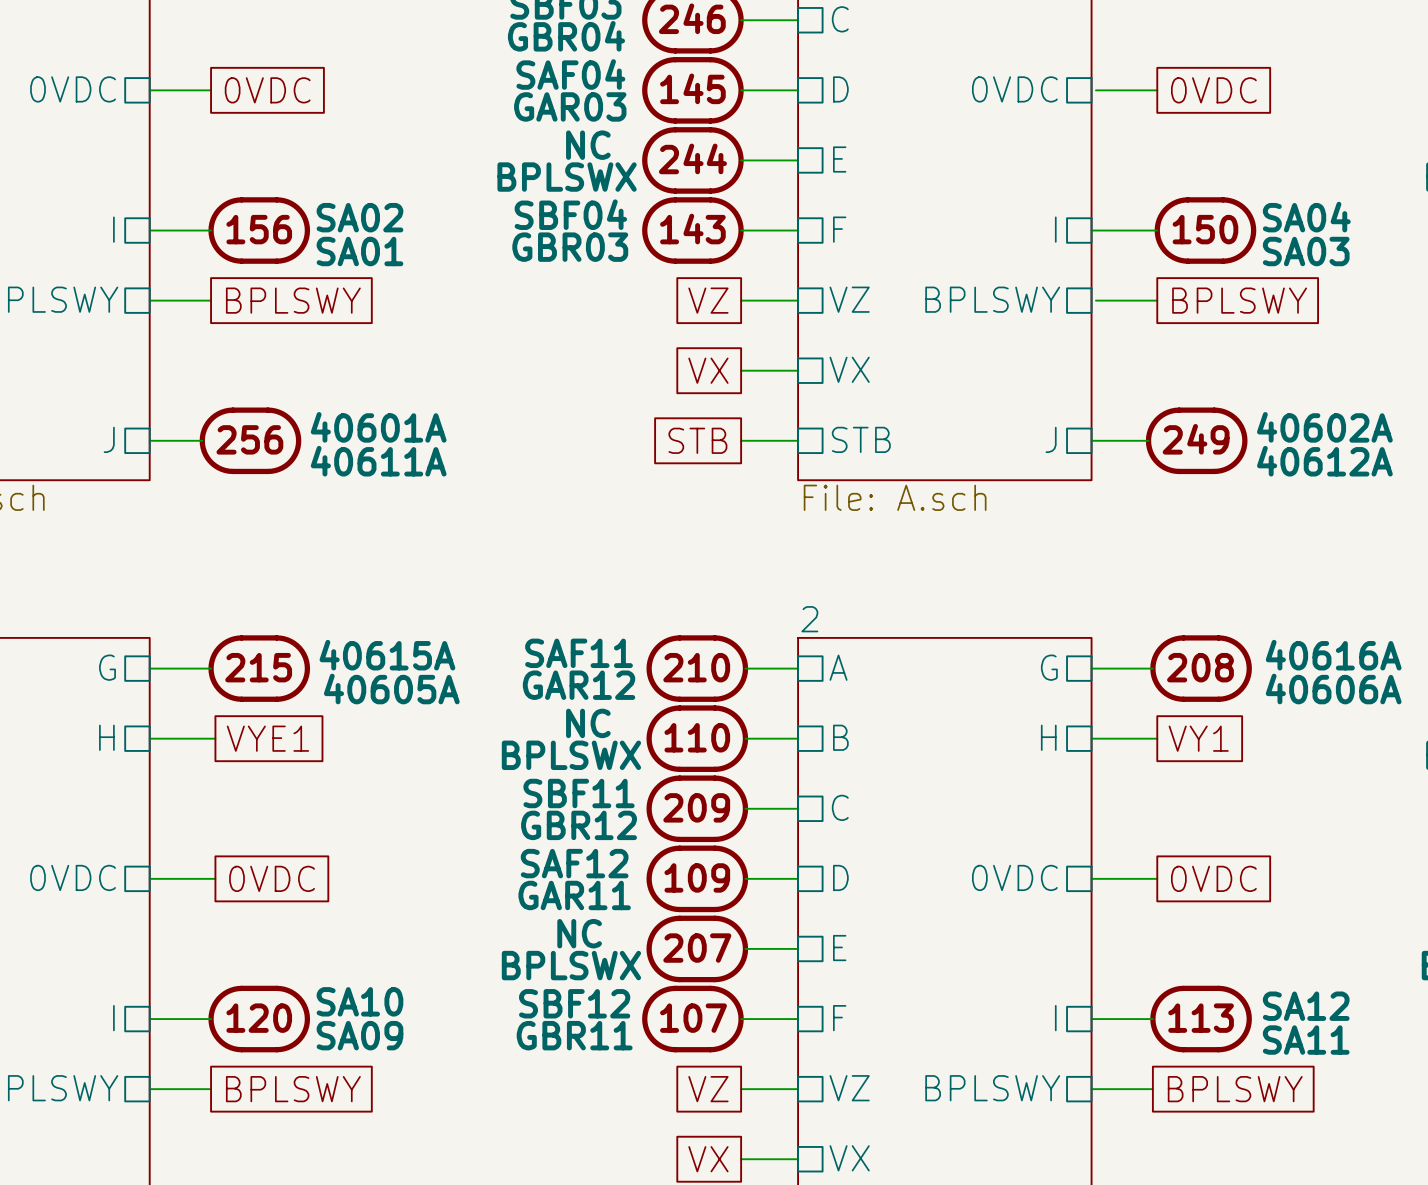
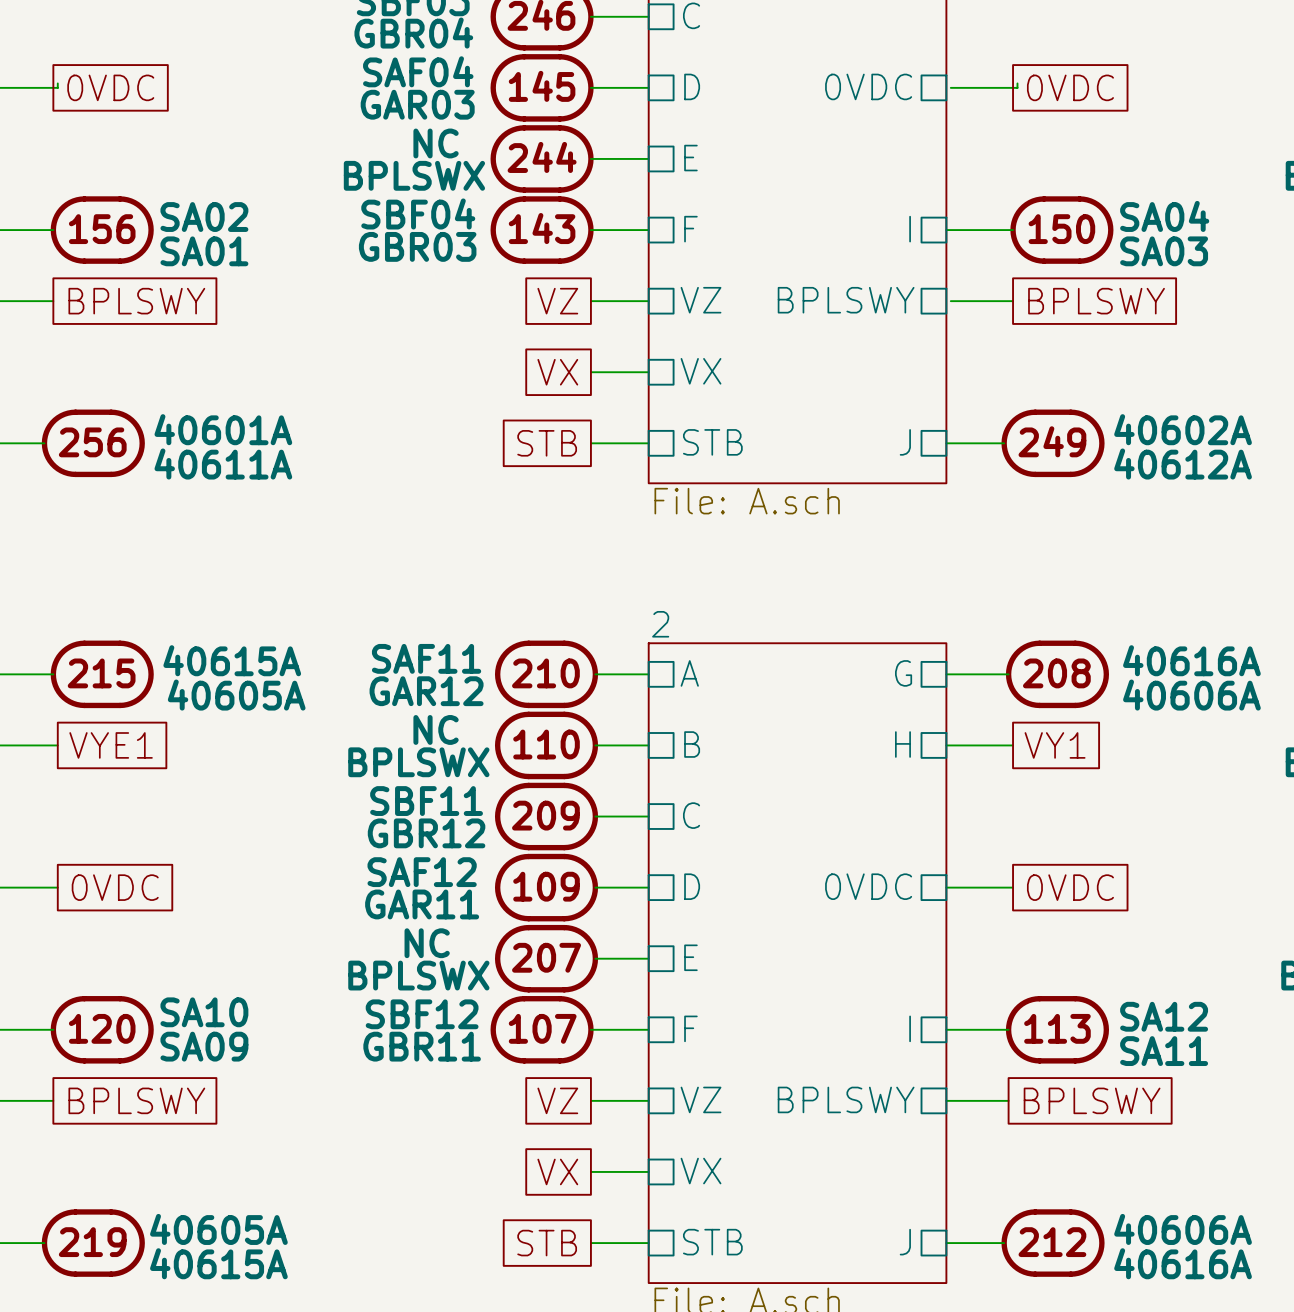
wire: none -> (57, 83) (57, 87) (53, 87)
wire: none -> (1017, 83) (1017, 87) (1013, 87)

